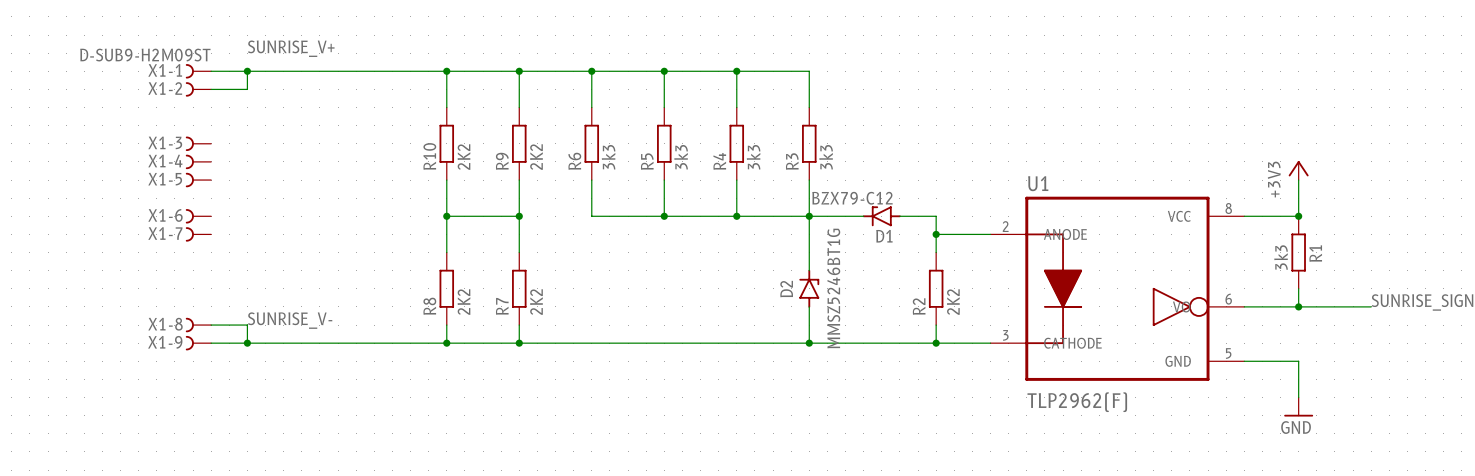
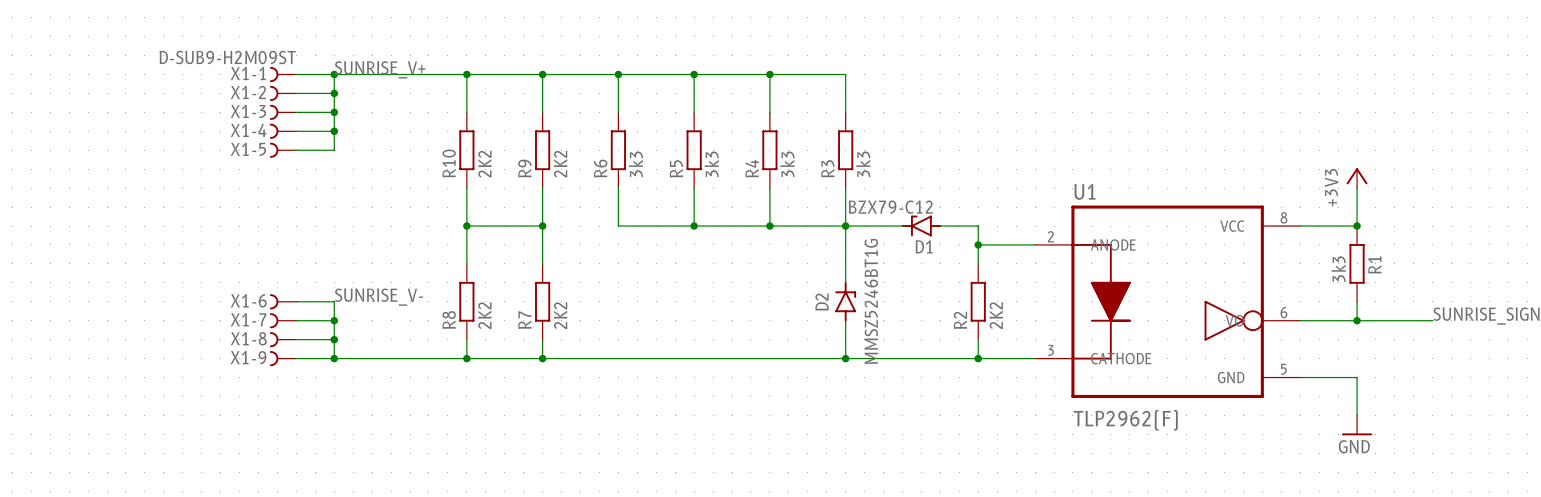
label position: SUNRISE_V+ (291, 48) -> SUNRISE_V+ (380, 69)
X1-1 position: (198, 71) -> (283, 74)
wire: (211, 71) (283, 71) -> none
wire: (247, 71) (247, 89) (211, 89) -> none
junction: (247, 71) -> none
wire: none -> (334, 74) (334, 150) (296, 150)
junction: none -> (334, 74)
X1-2 position: (198, 89) -> (283, 93)
wire: none -> (296, 93) (334, 93)
junction: none -> (334, 93)
wire: none -> (296, 112) (334, 112)
junction: none -> (334, 112)
wire: none -> (296, 131) (334, 131)
junction: none -> (334, 131)
X1-3 position: (198, 143) -> (283, 112)
X1-4 position: (198, 161) -> (283, 131)
X1-5 position: (198, 180) -> (283, 150)
X1-6 position: (198, 216) -> (283, 301)
X1-7 position: (198, 234) -> (283, 320)
wire: none -> (296, 301) (334, 301) (334, 358)
wire: none -> (296, 320) (334, 320)
junction: none -> (334, 320)
label position: SUNRISE_V- (290, 320) -> SUNRISE_V- (378, 297)
X1-8 position: (198, 325) -> (283, 339)
wire: (211, 325) (247, 325) (247, 343) -> none
wire: none -> (296, 339) (334, 339)
junction: none -> (334, 339)
X1-9 position: (198, 343) -> (283, 358)
wire: (211, 343) (283, 343) -> none
junction: (247, 343) -> none
junction: none -> (334, 358)

